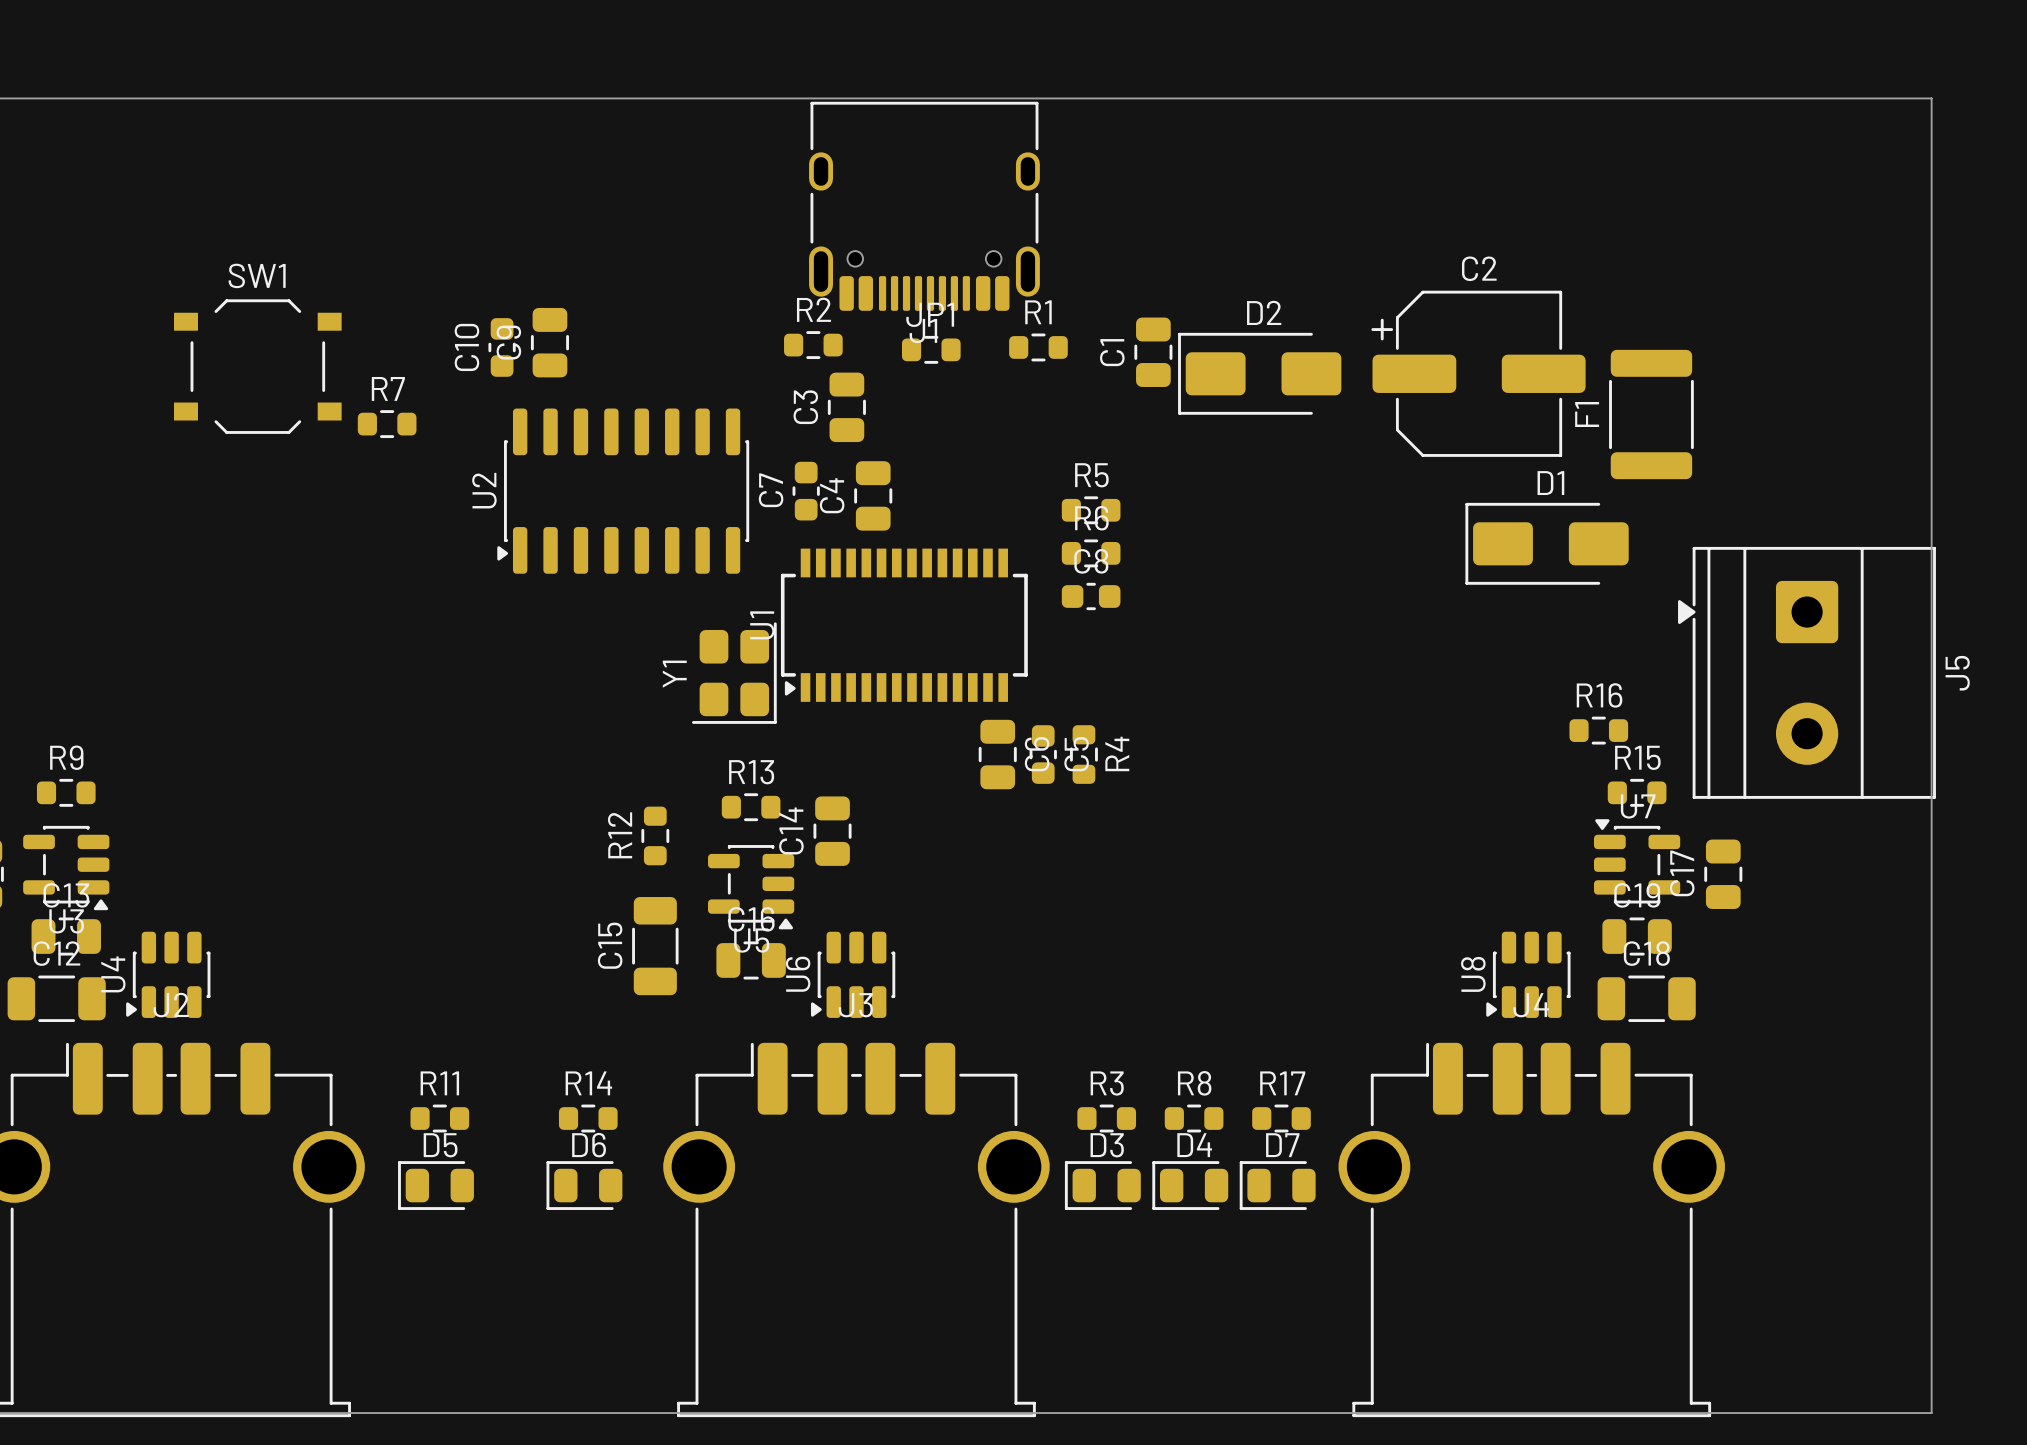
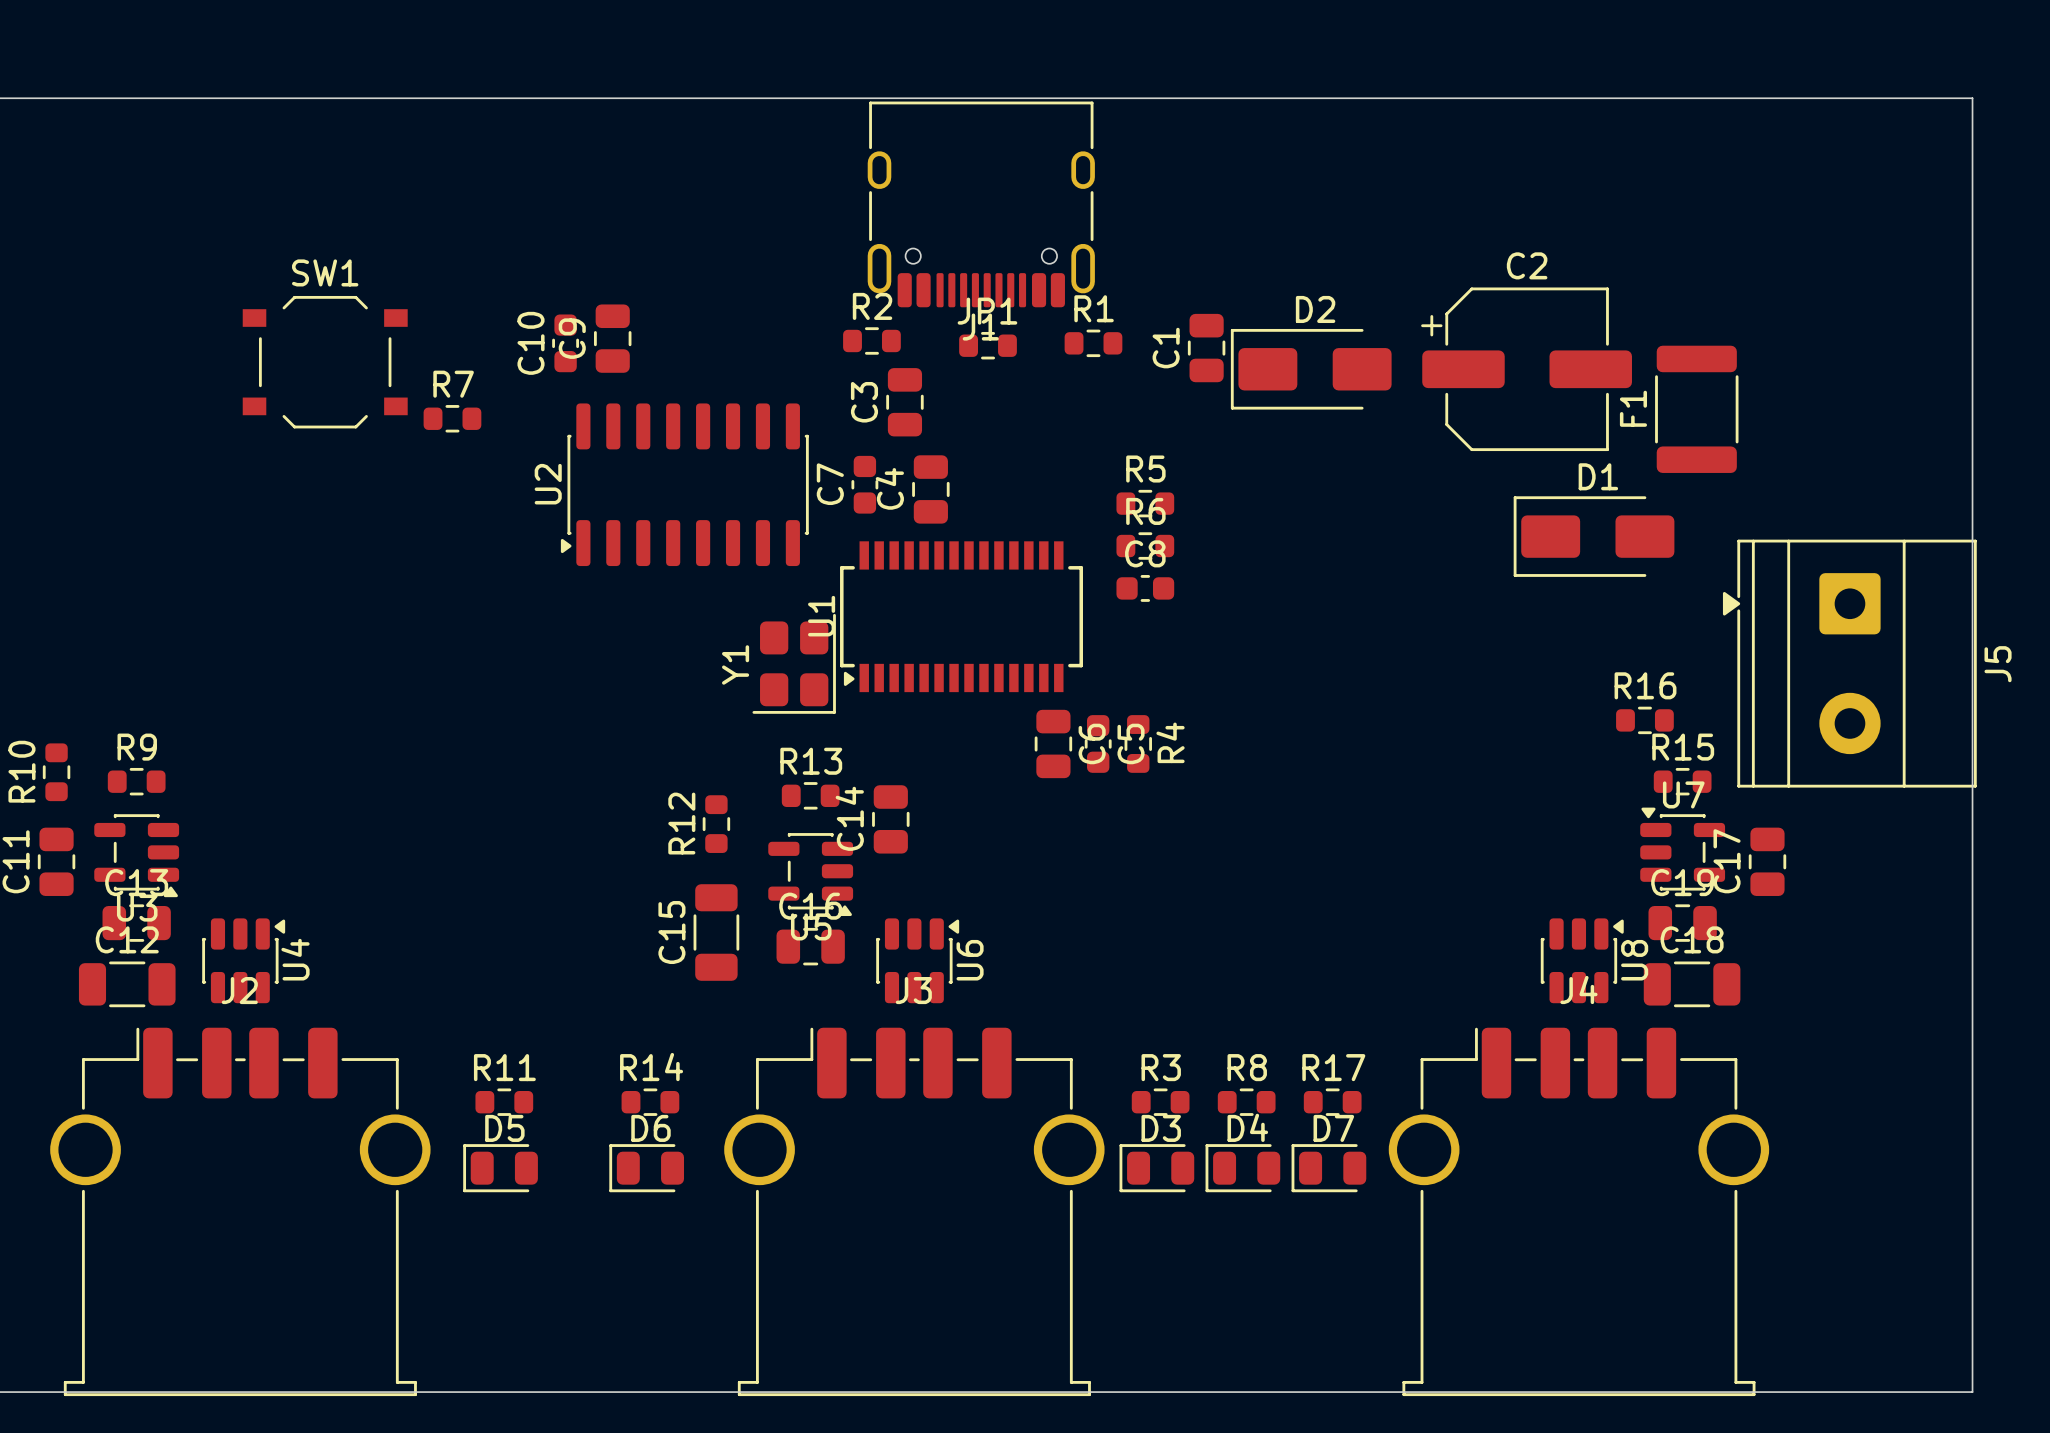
U4 rotation: 0° (168, 974) -> 180° (243, 960)
U6 rotation: 0° (853, 974) -> 180° (917, 960)
U8 rotation: 0° (1528, 974) -> 180° (1582, 960)

